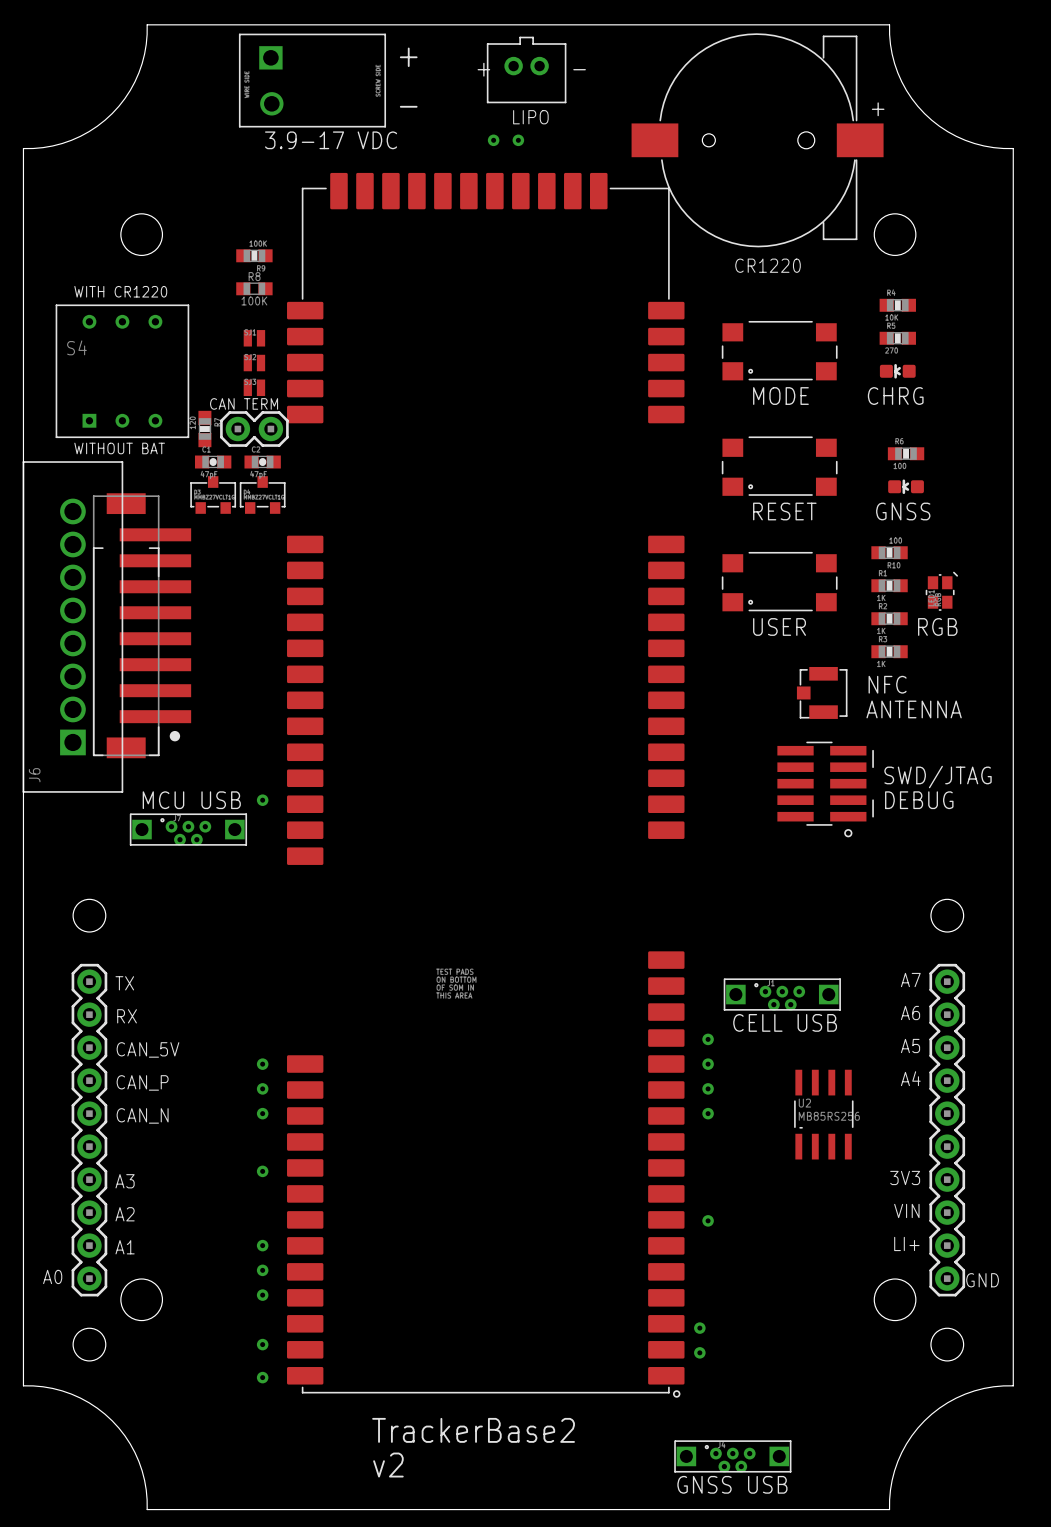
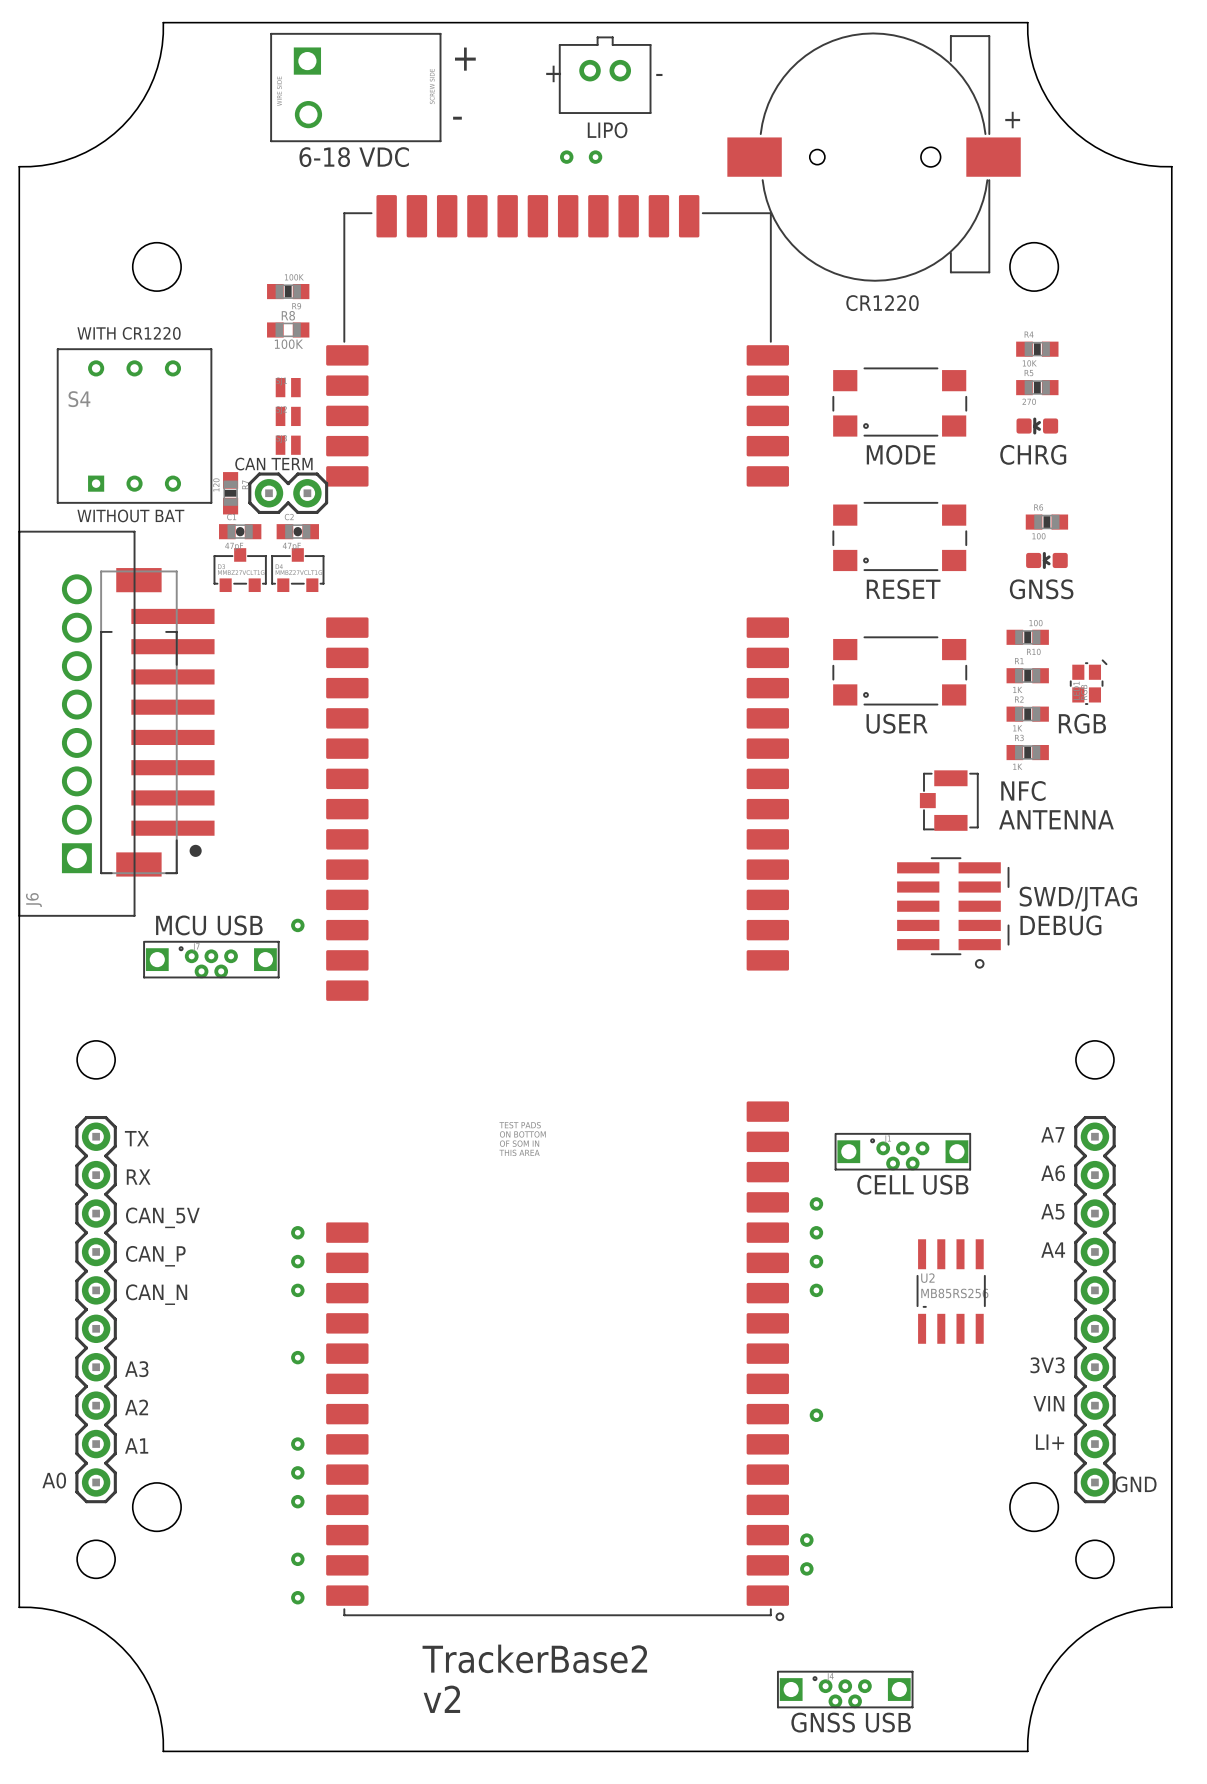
text: 3.9-17 VDC (331, 140) -> 6-18 VDC (354, 157)

